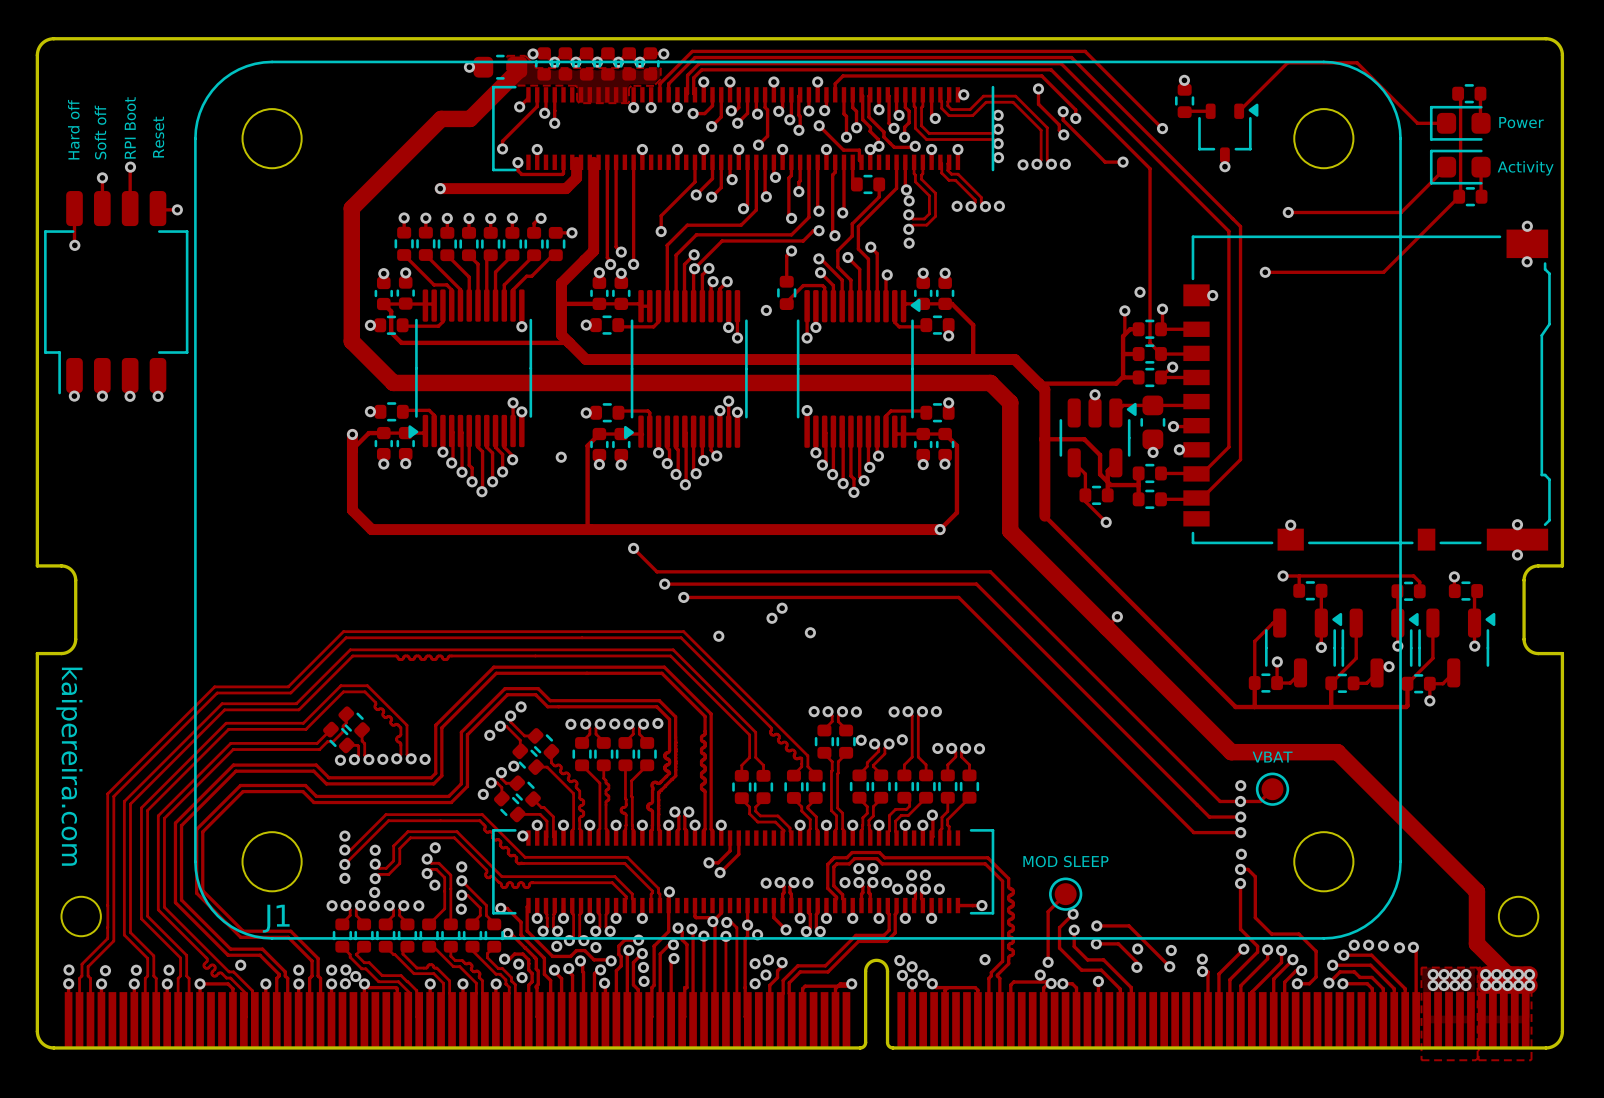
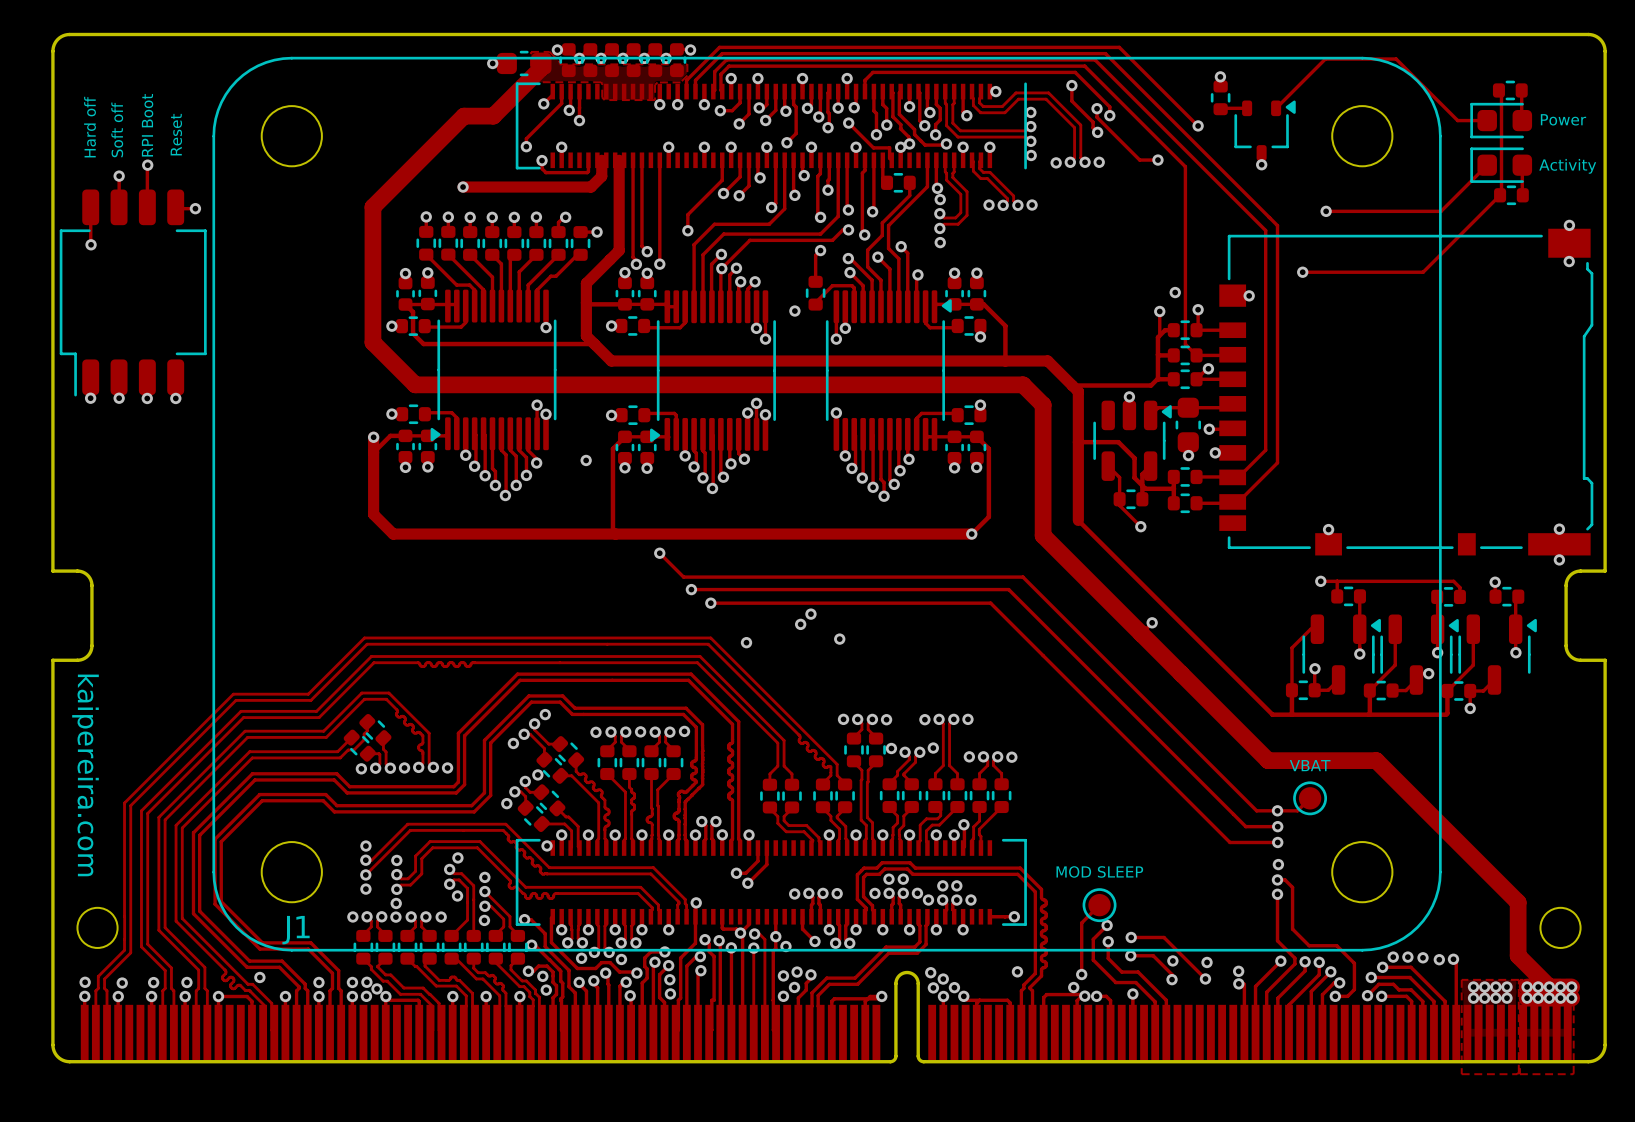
via: (1240, 785) -> none

